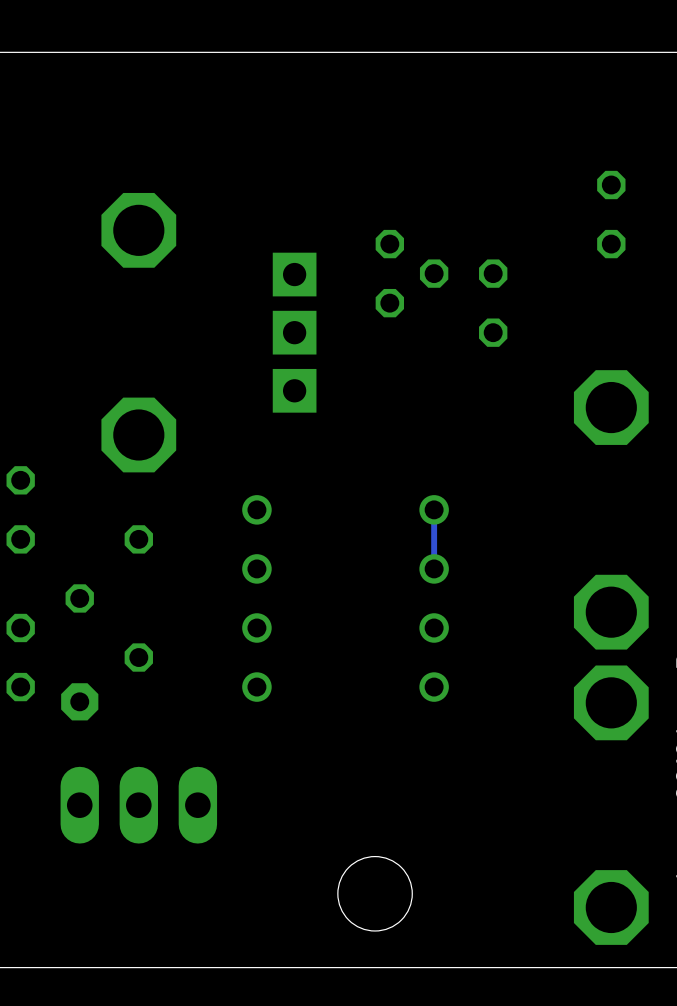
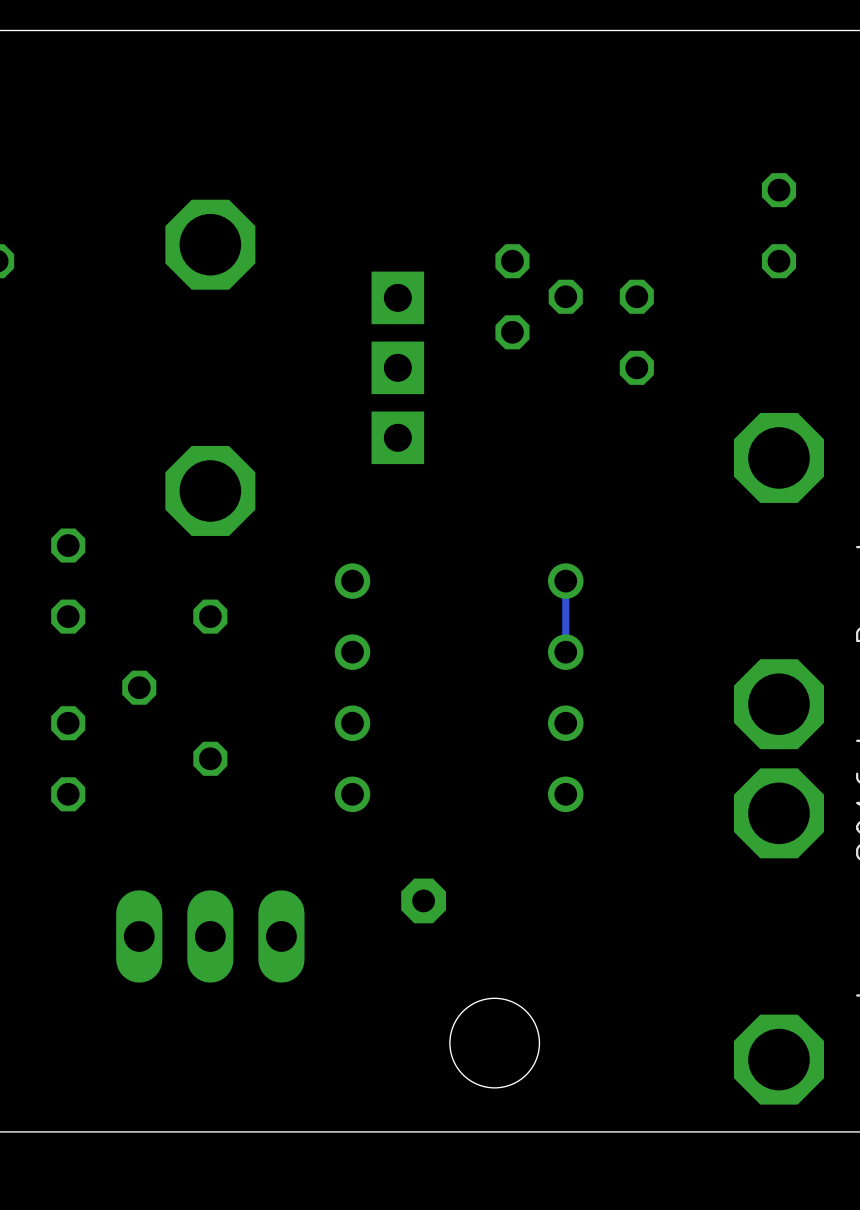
part position: (79, 701) -> (423, 900)

